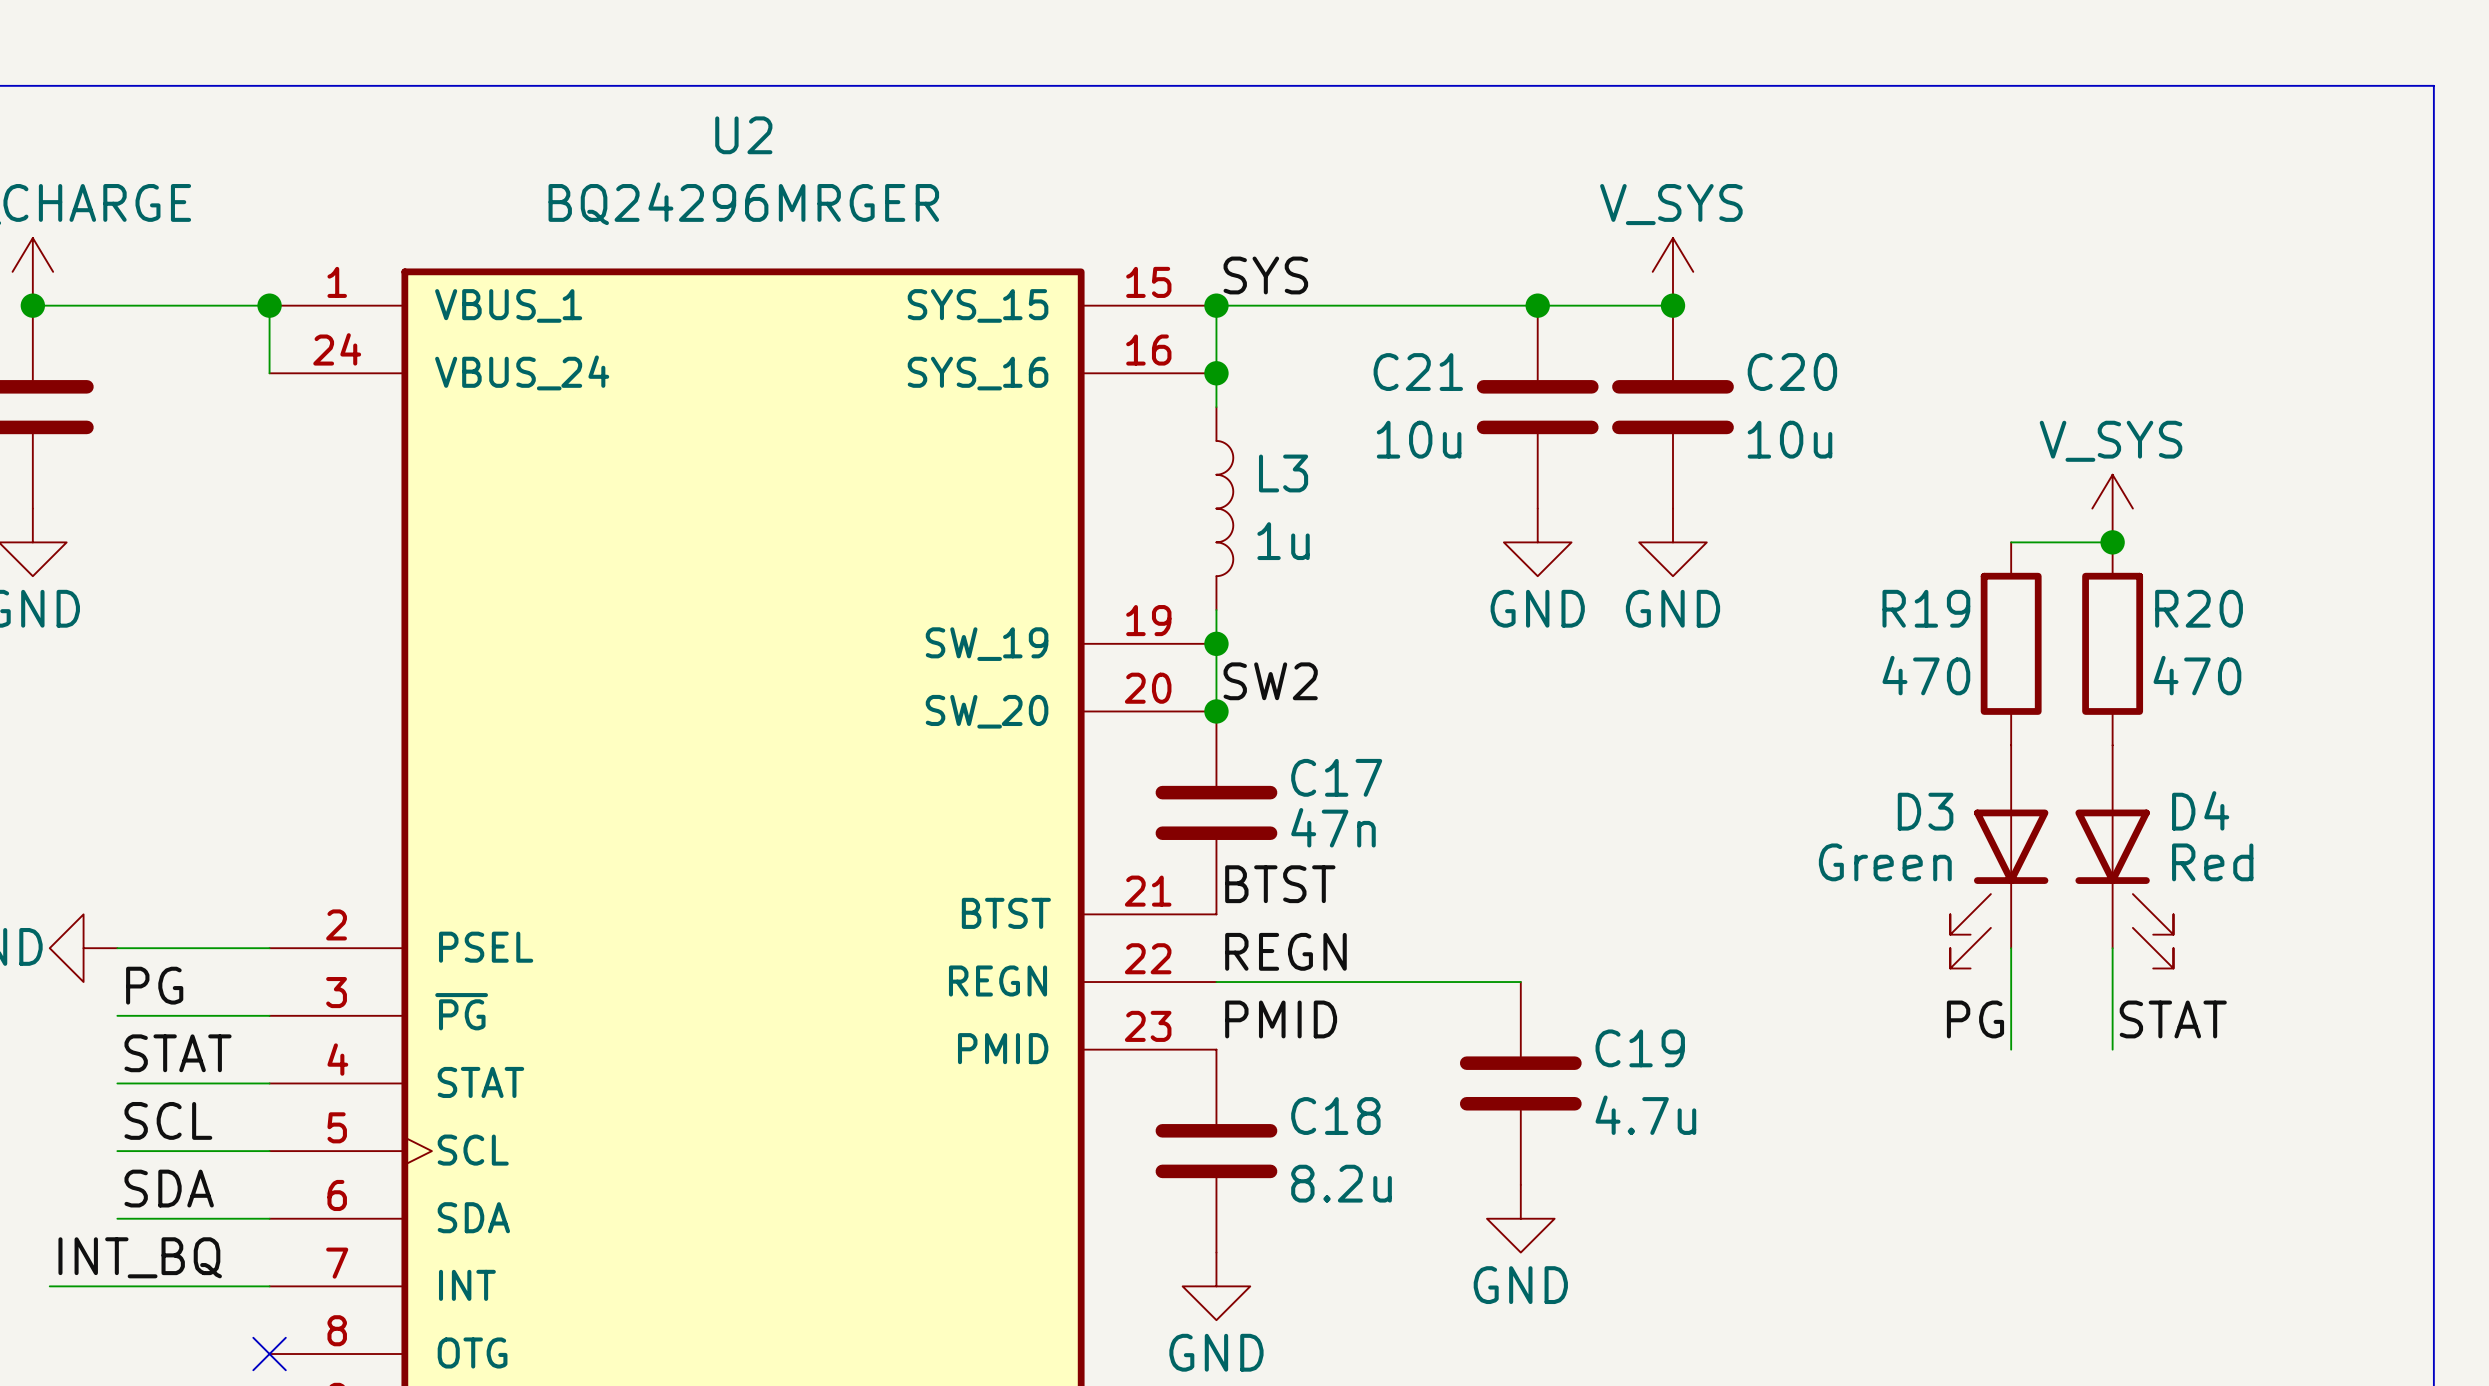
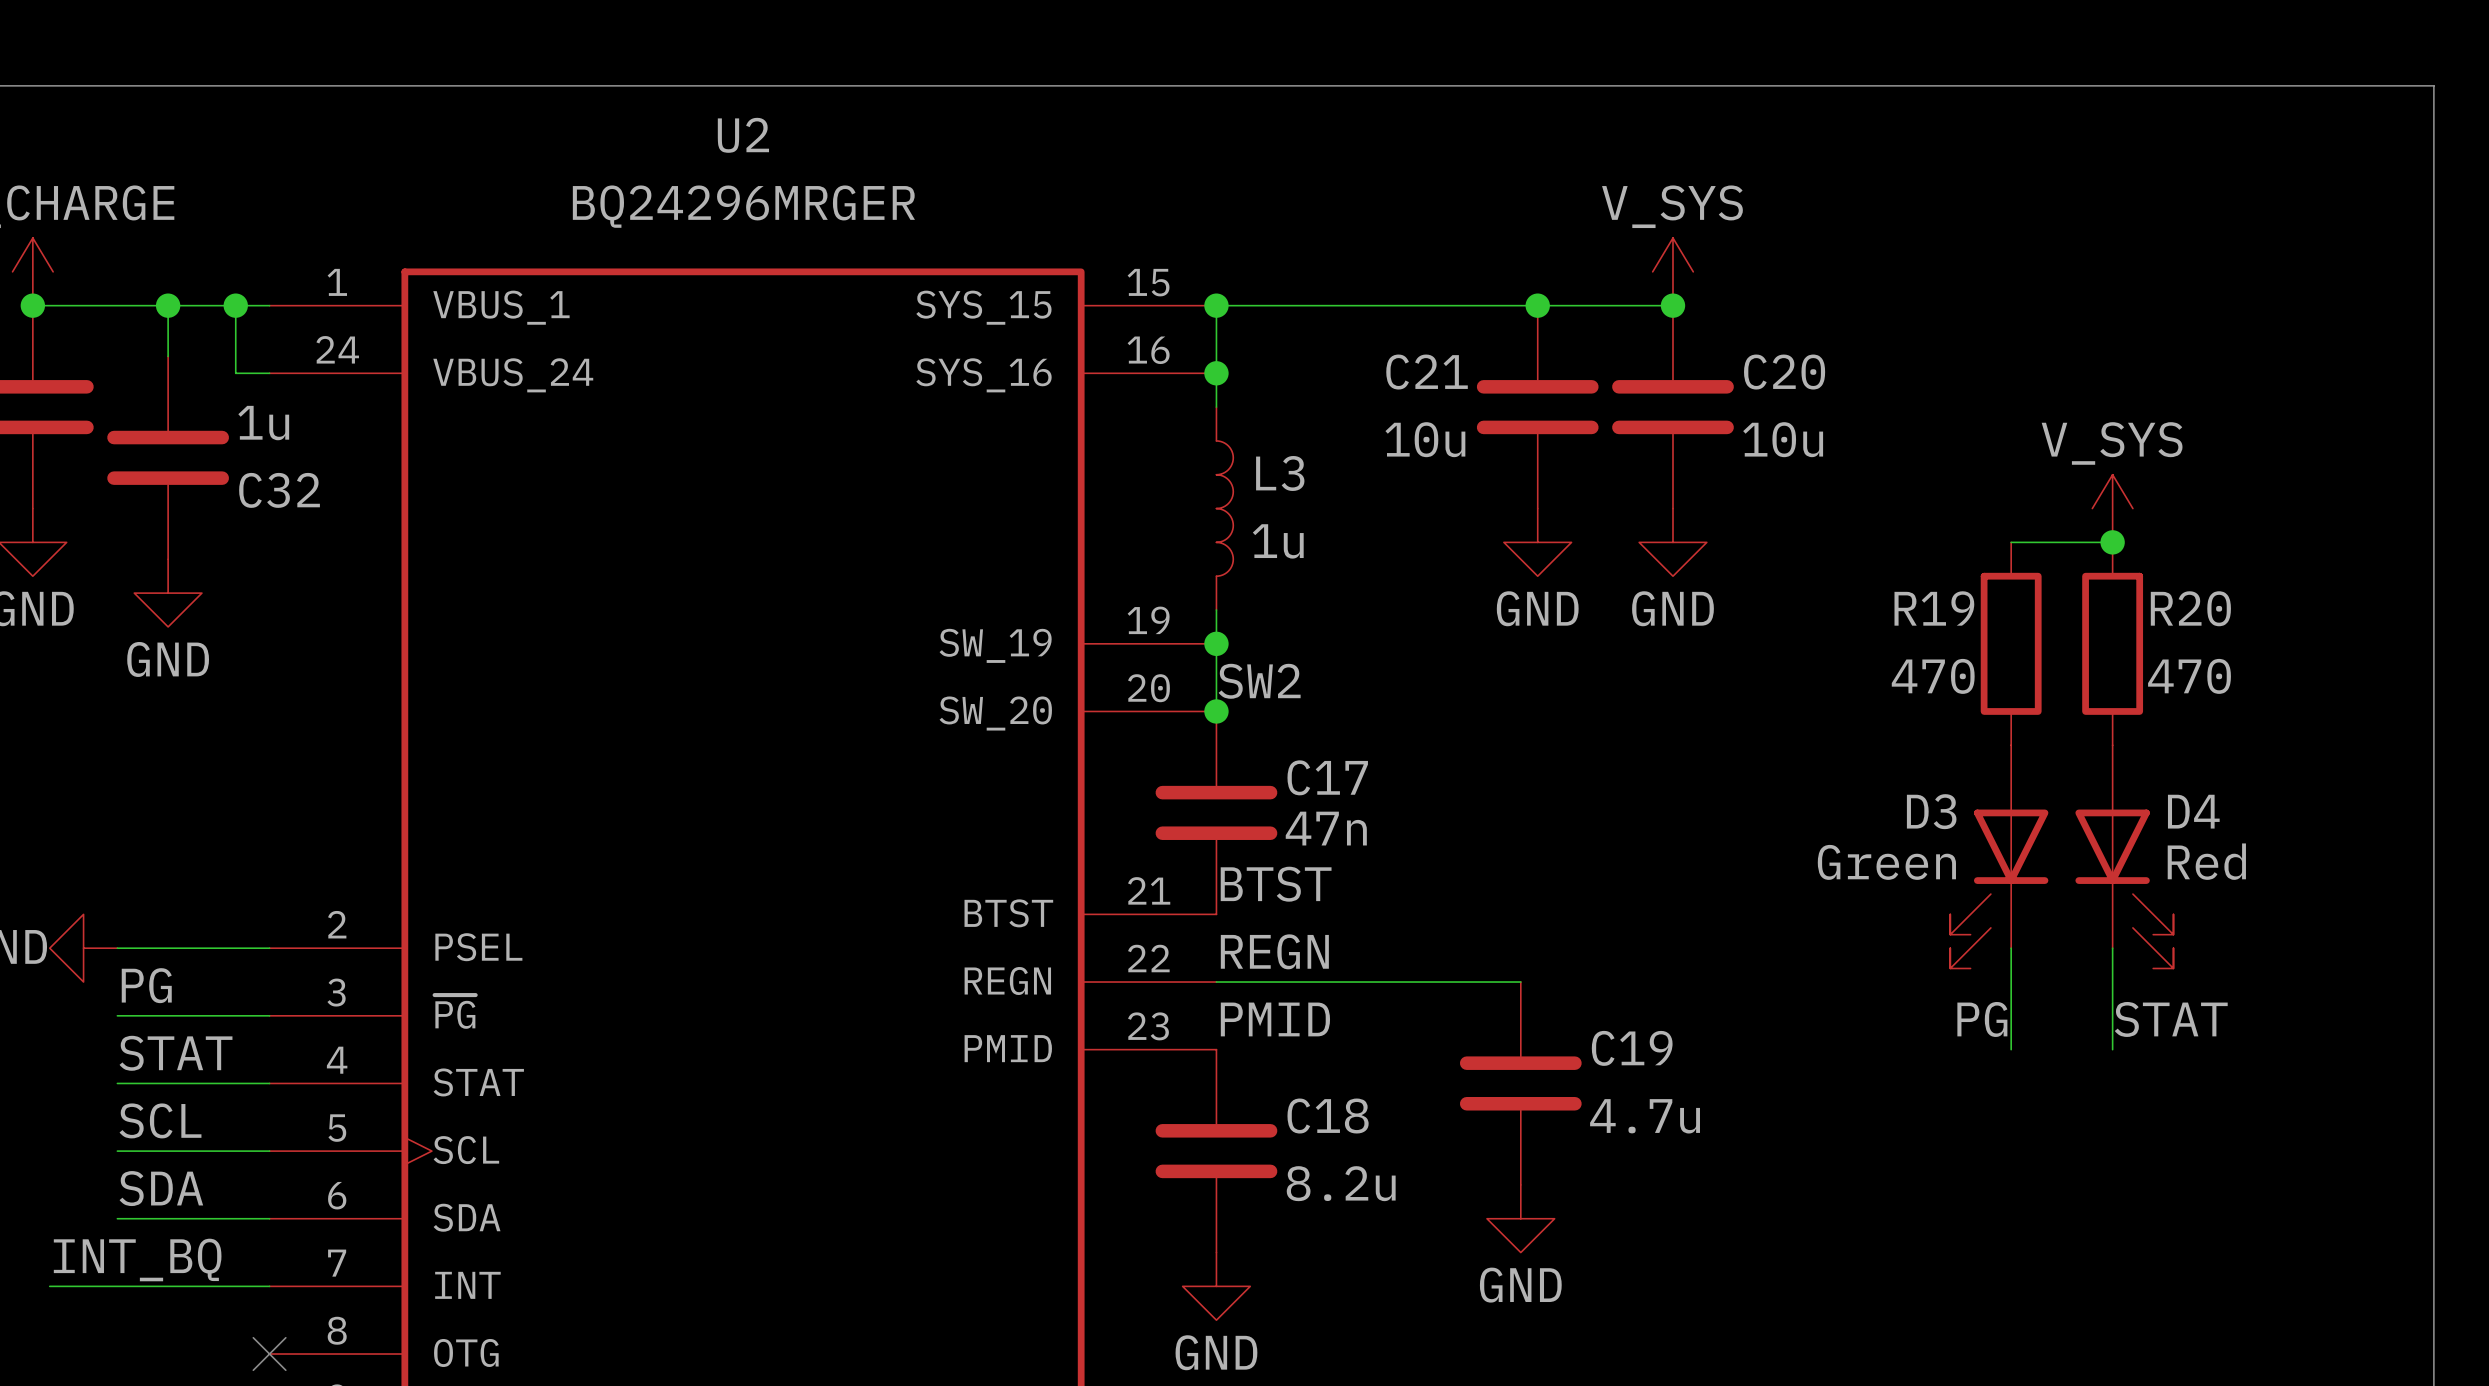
label: SYS (1265, 275) -> none
wire: none -> (168, 305) (168, 356)
junction: none -> (168, 305)
wire: (269, 305) (269, 373) -> (235, 305) (235, 373) (269, 373)
junction position: (269, 305) -> (235, 305)
C32: none -> 1u (168, 457)
power symbol: none -> GND (168, 593)

